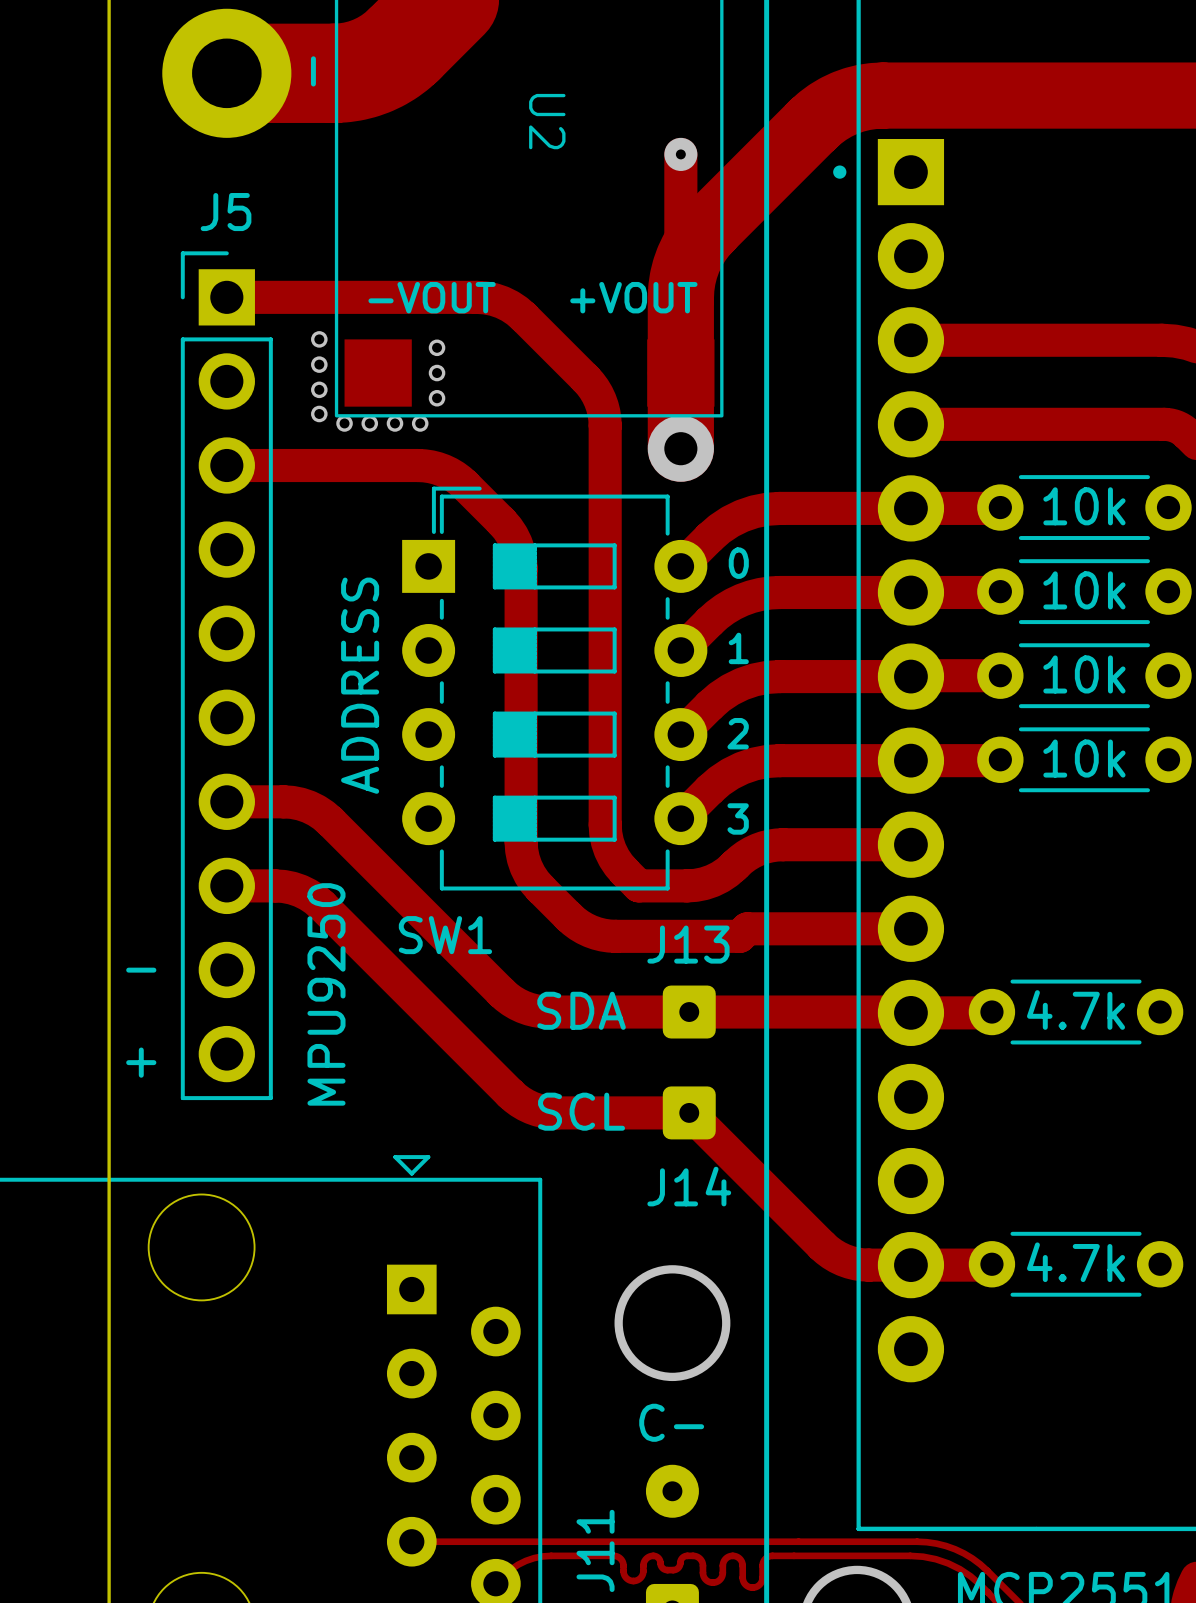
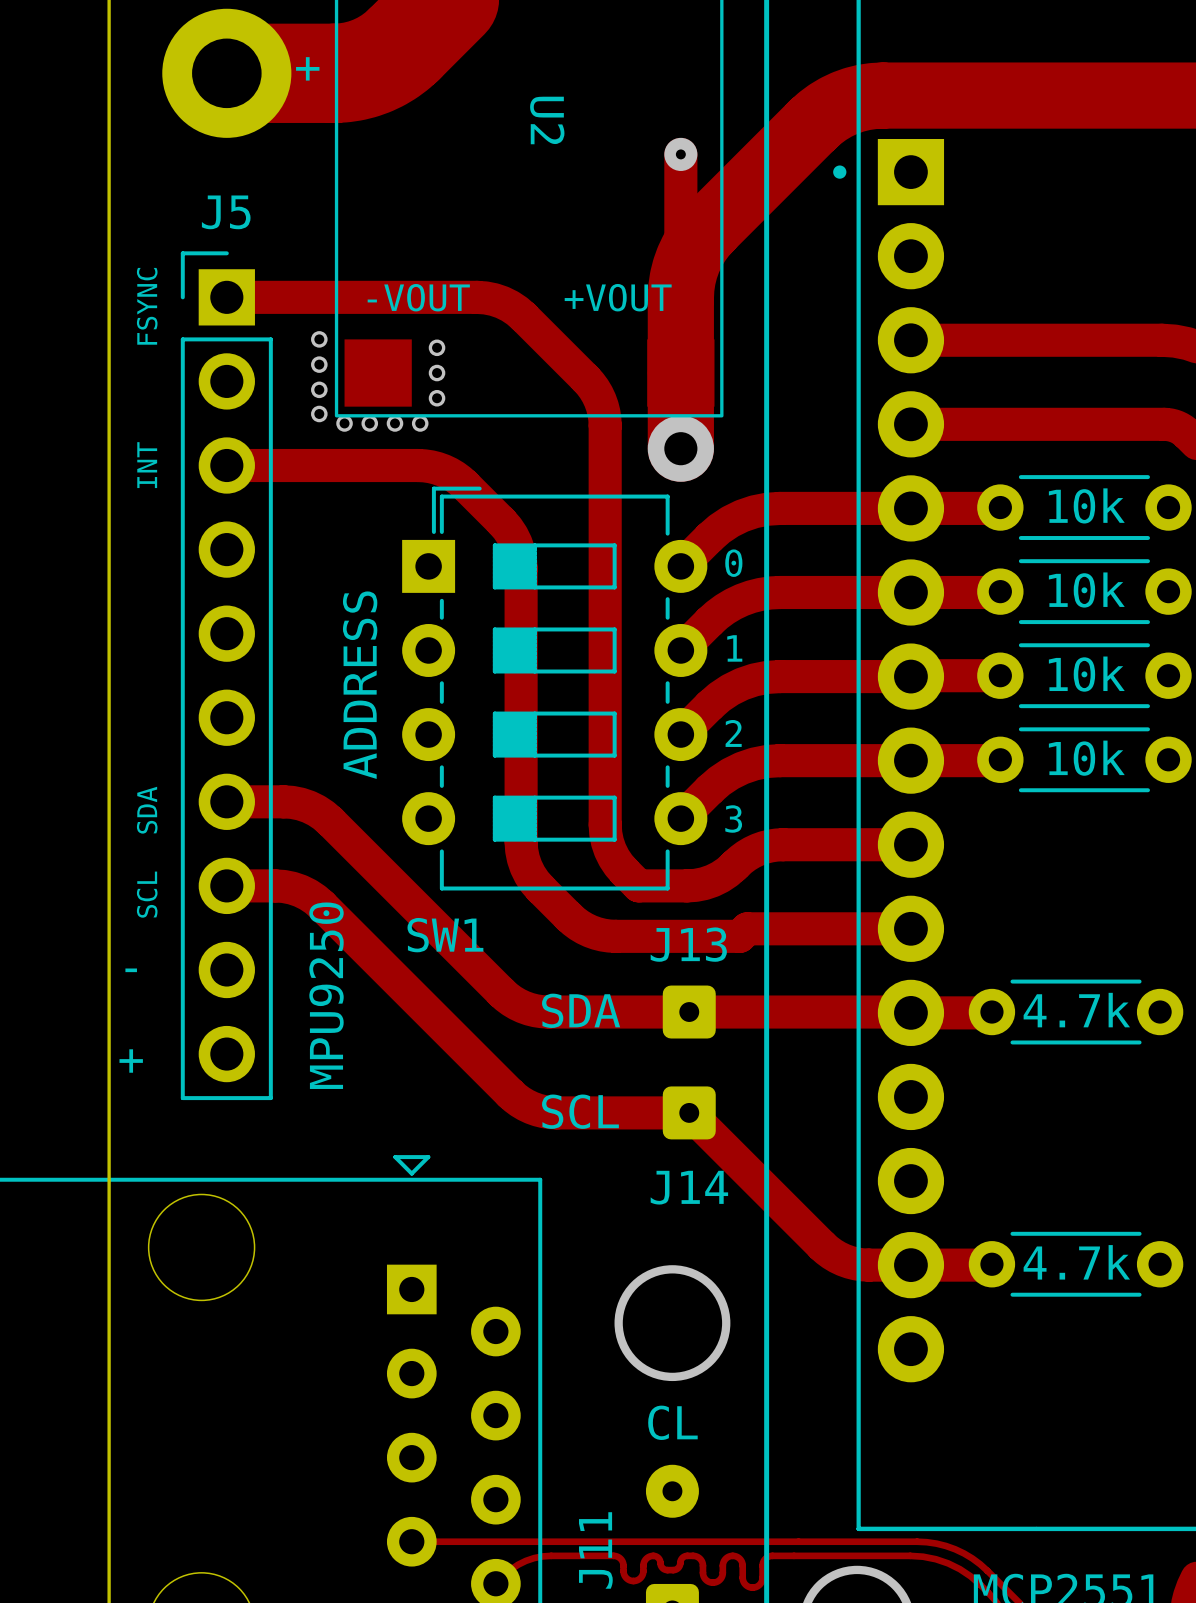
text: none -> + (307, 68)
text: - (313, 71) -> none
text: none -> FSYNC (147, 306)
text: none -> INT (147, 465)
text: none -> SDA (147, 810)
text: none -> SCL (147, 894)
text: C- (671, 1422) -> CL (672, 1422)

